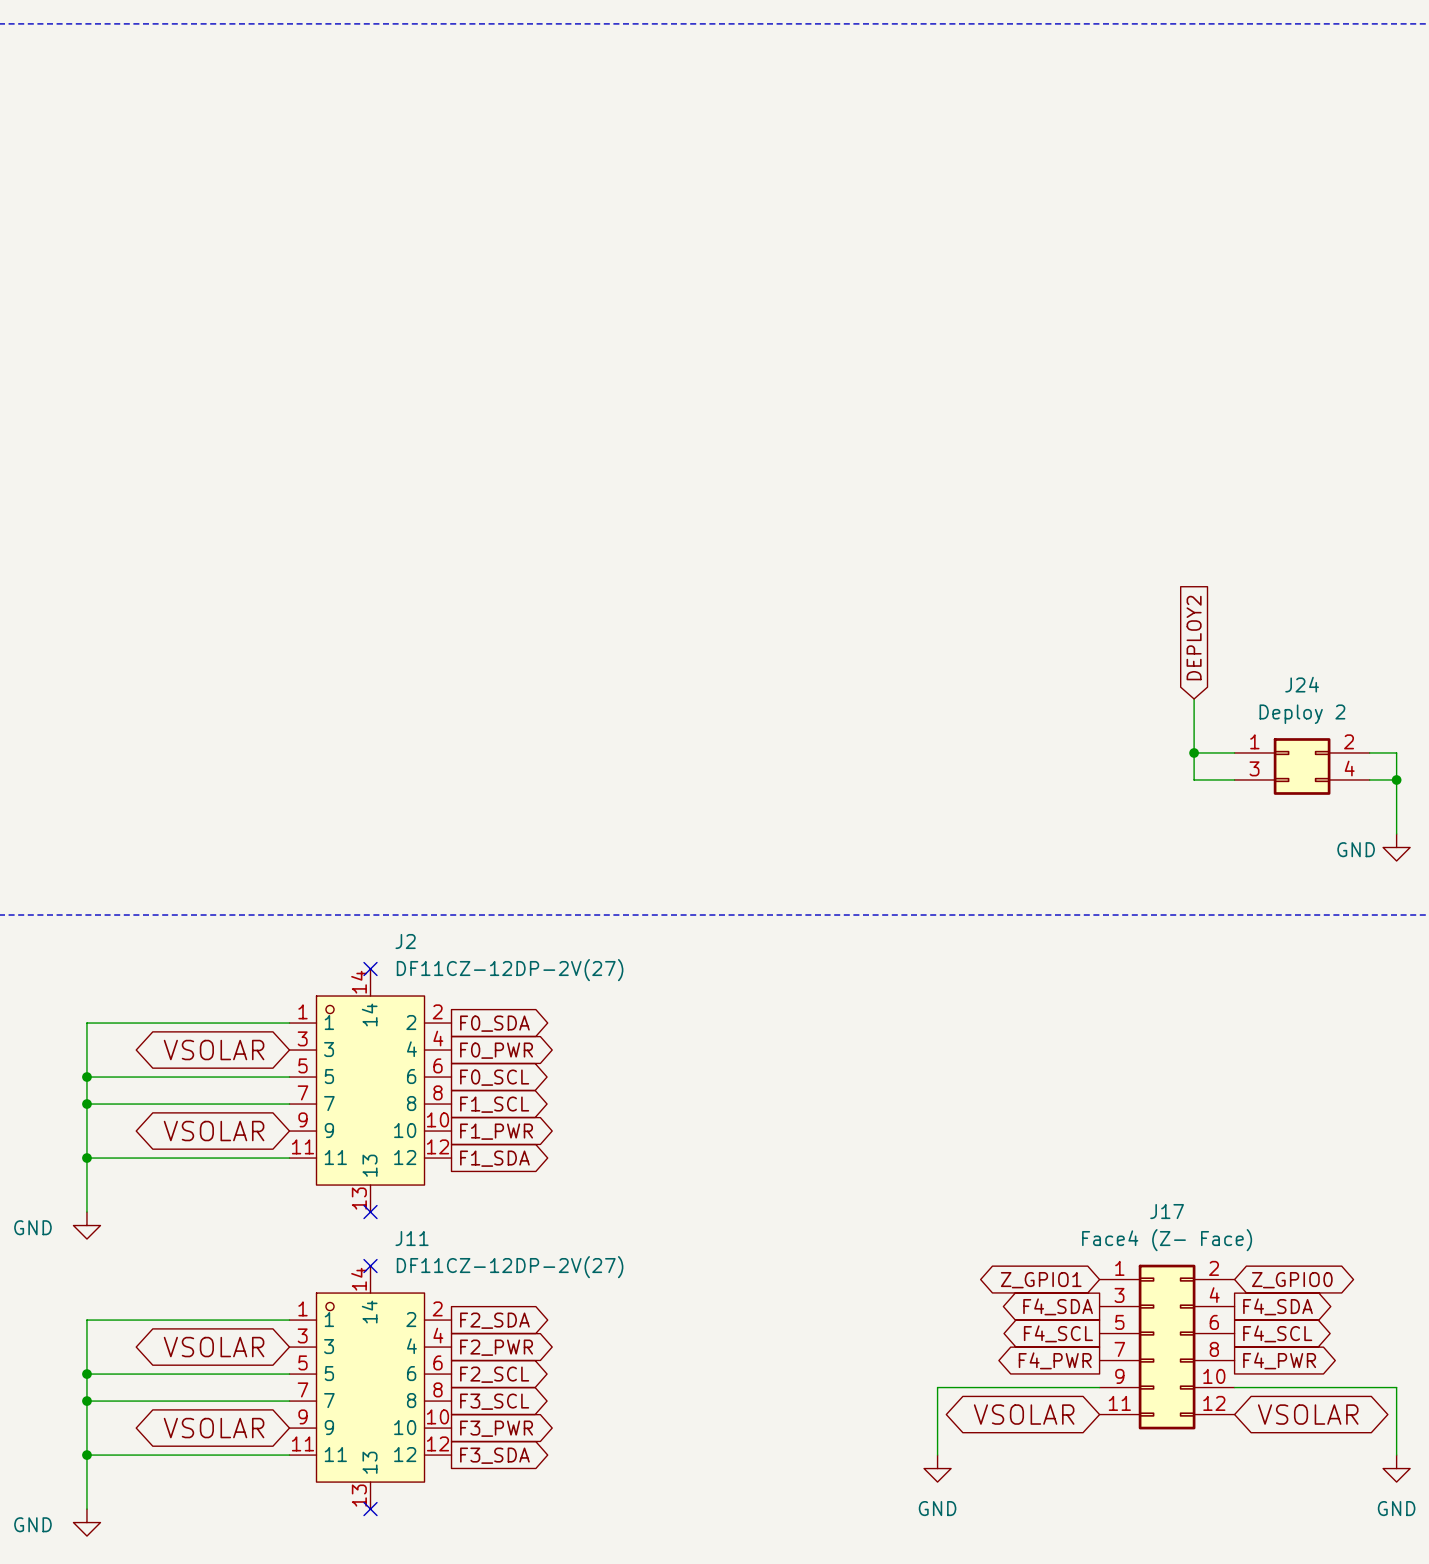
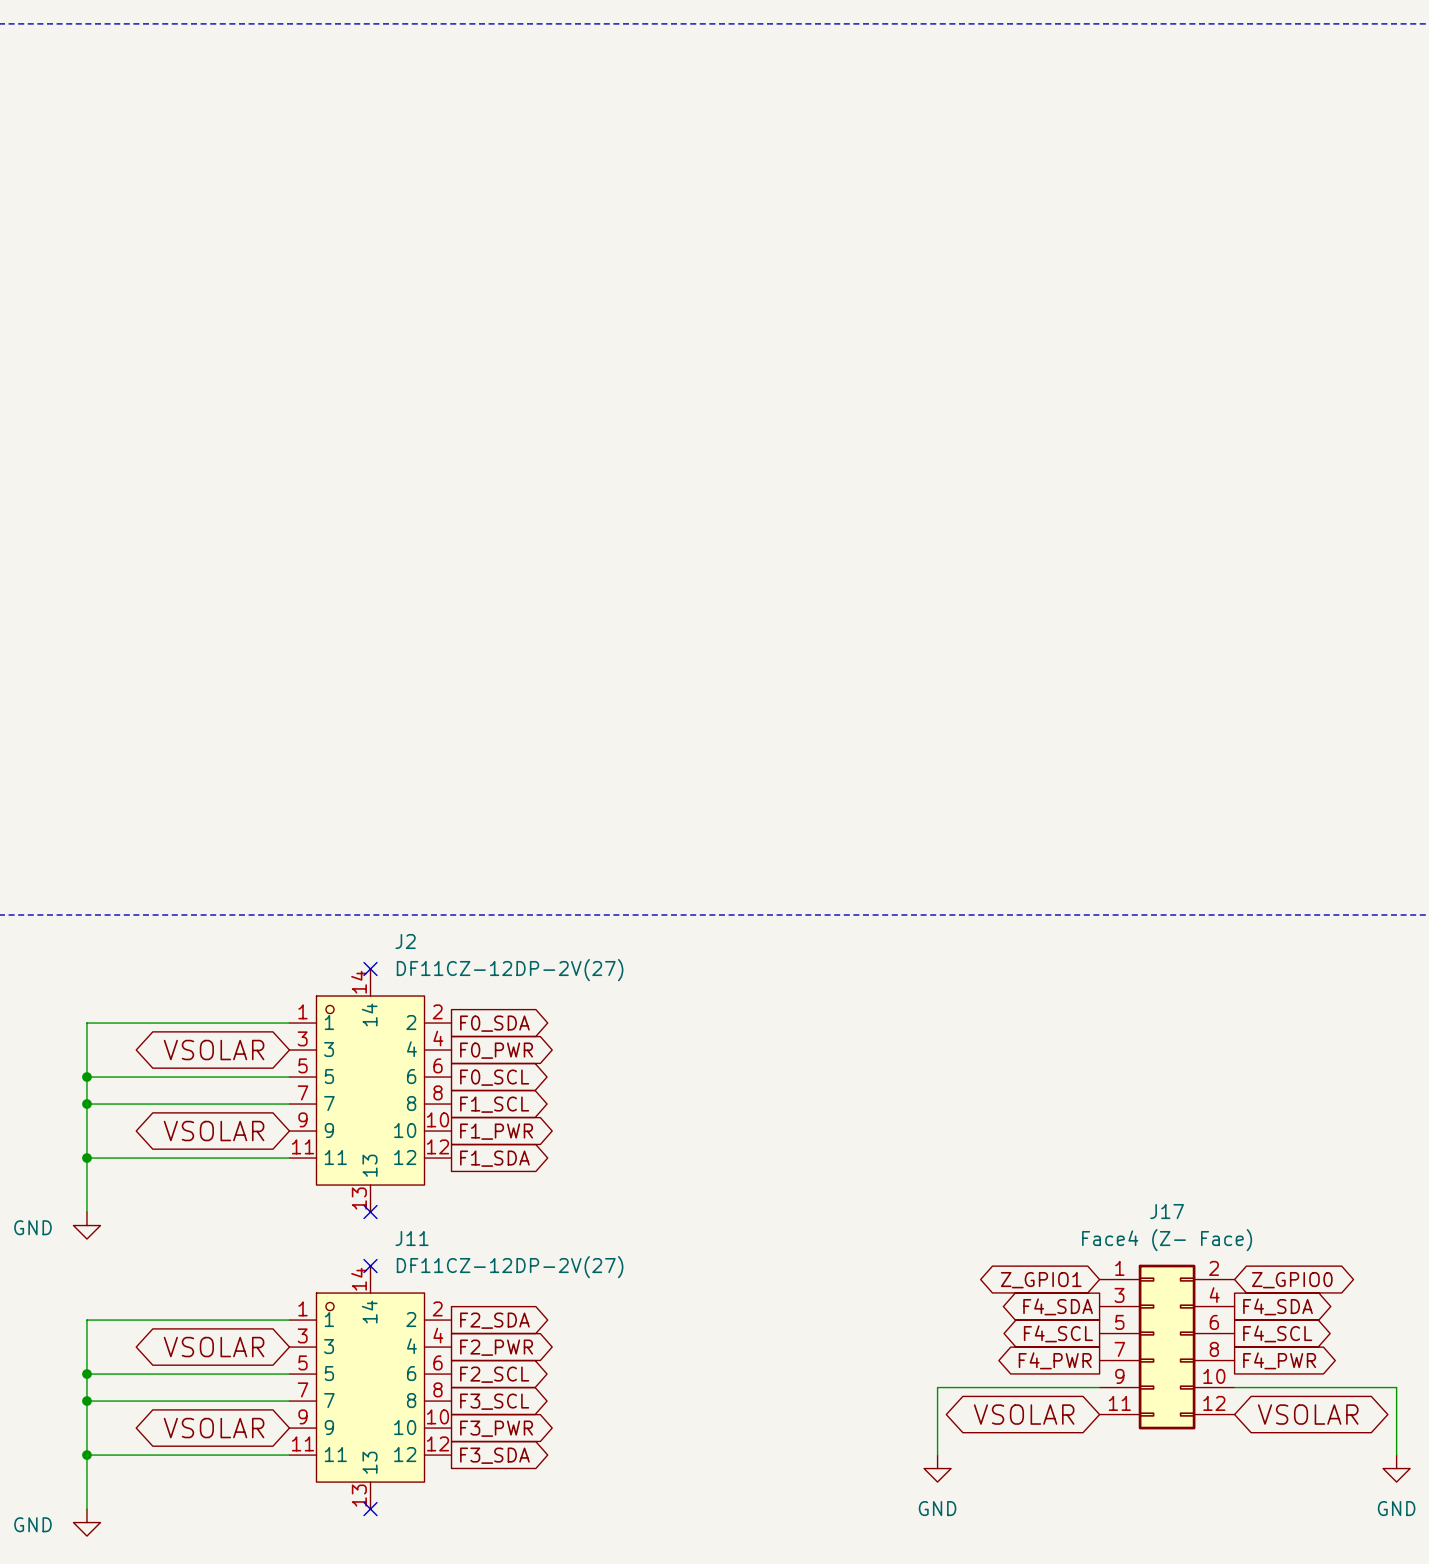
global label: DEPLOY2 (1194, 638) -> none
wire: (1194, 698) (1194, 779) (1234, 779) -> none
wire: (1194, 752) (1234, 752) -> none
junction: (1194, 752) -> none
wire: (1369, 752) (1396, 752) (1396, 833) -> none
J24: Deploy 2 (1302, 766) -> none
wire: (1369, 779) (1396, 779) -> none
junction: (1396, 779) -> none
power symbol: GND (1396, 847) -> none

